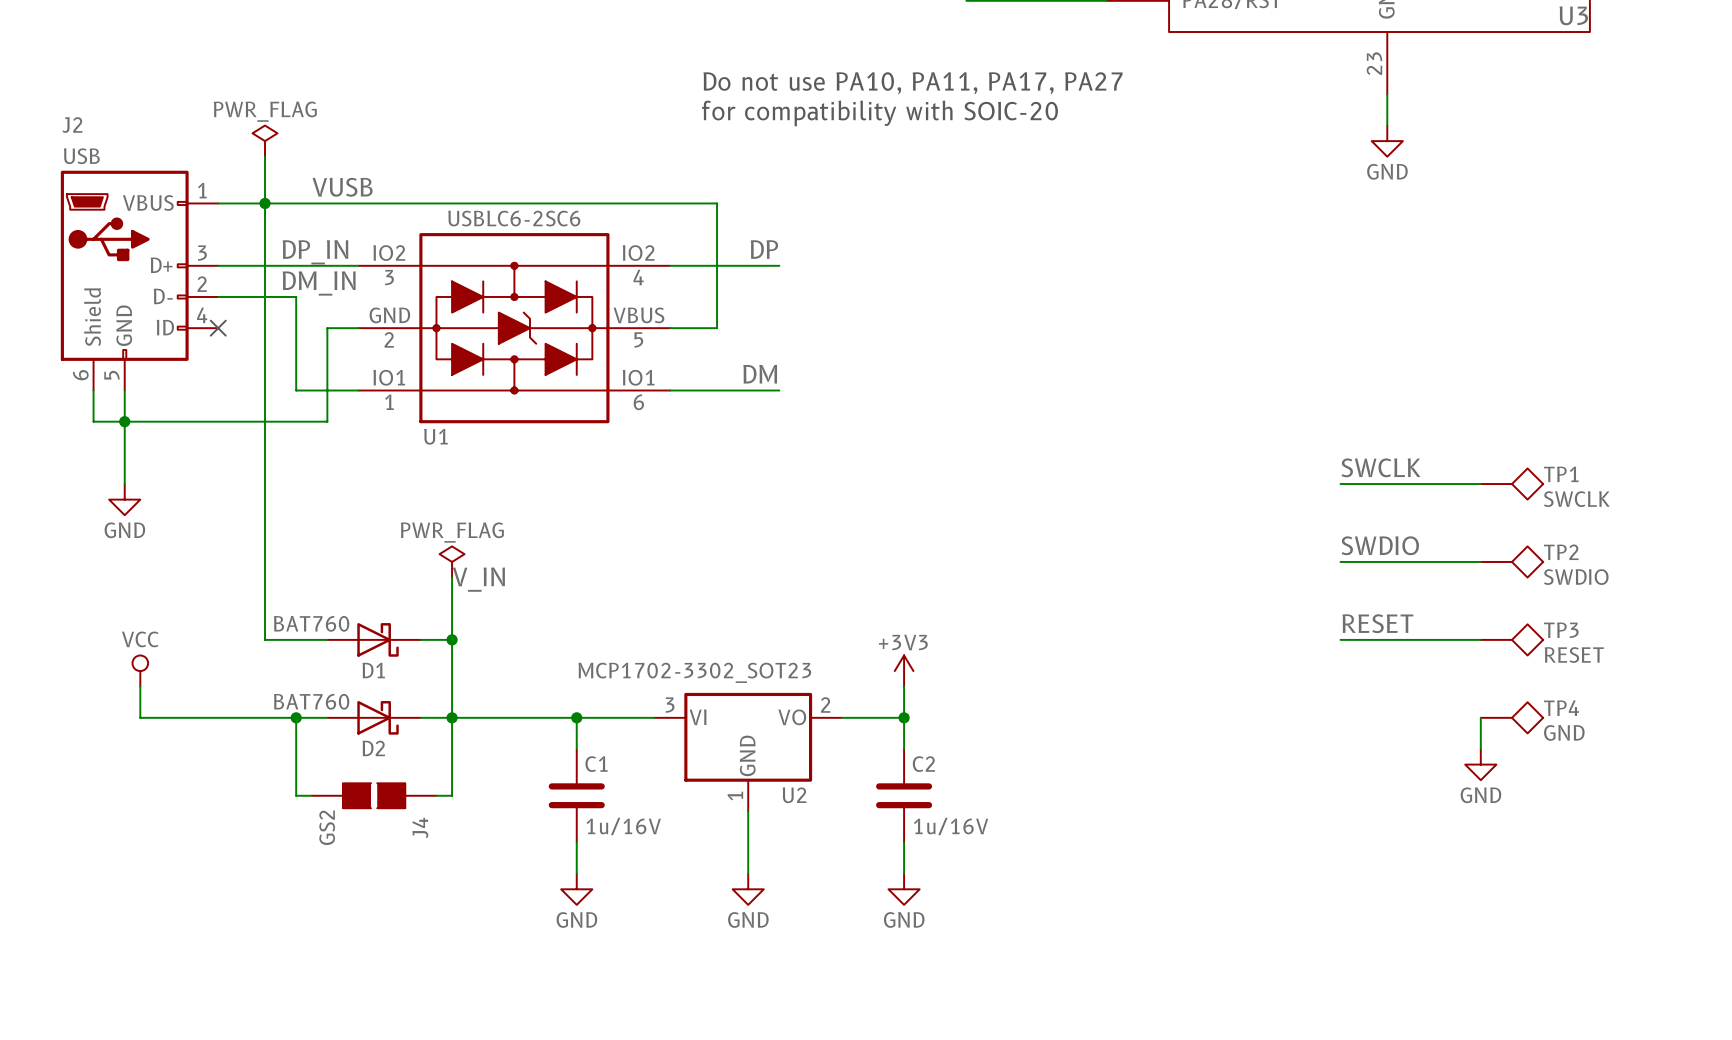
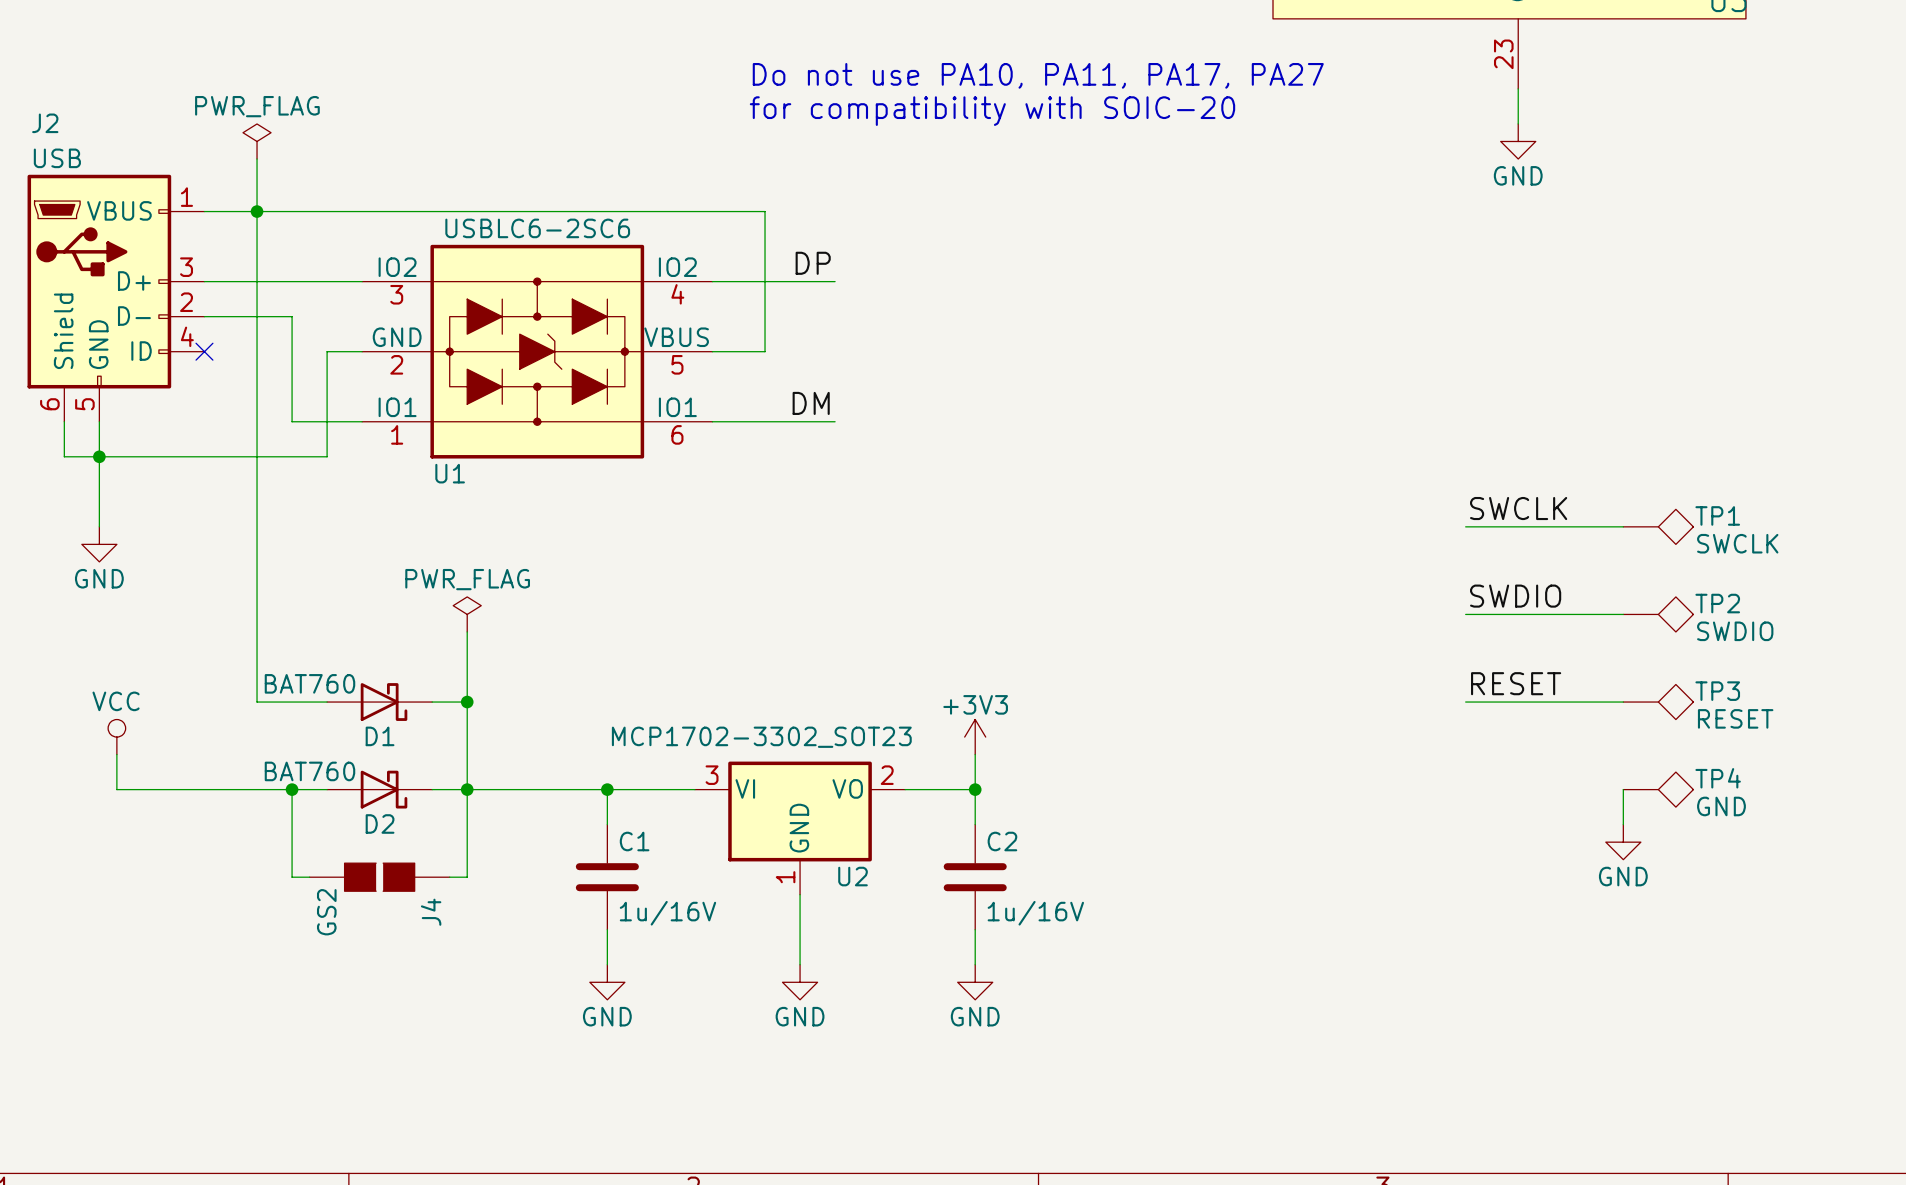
label: VUSB (342, 187) -> none
label: DP_IN (315, 252) -> none
label: DM_IN (319, 283) -> none
label: V_IN (478, 579) -> none

